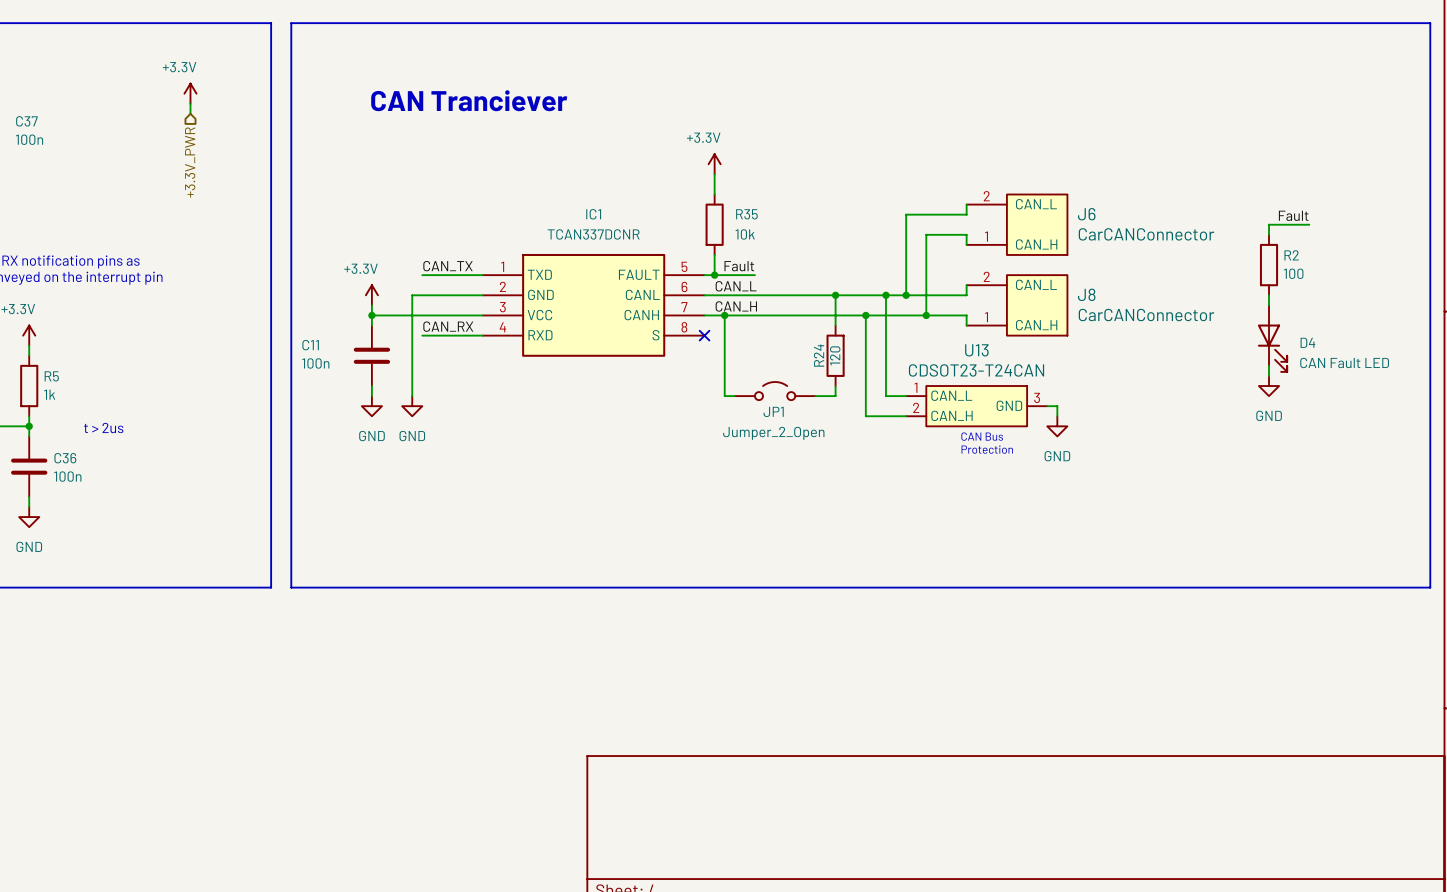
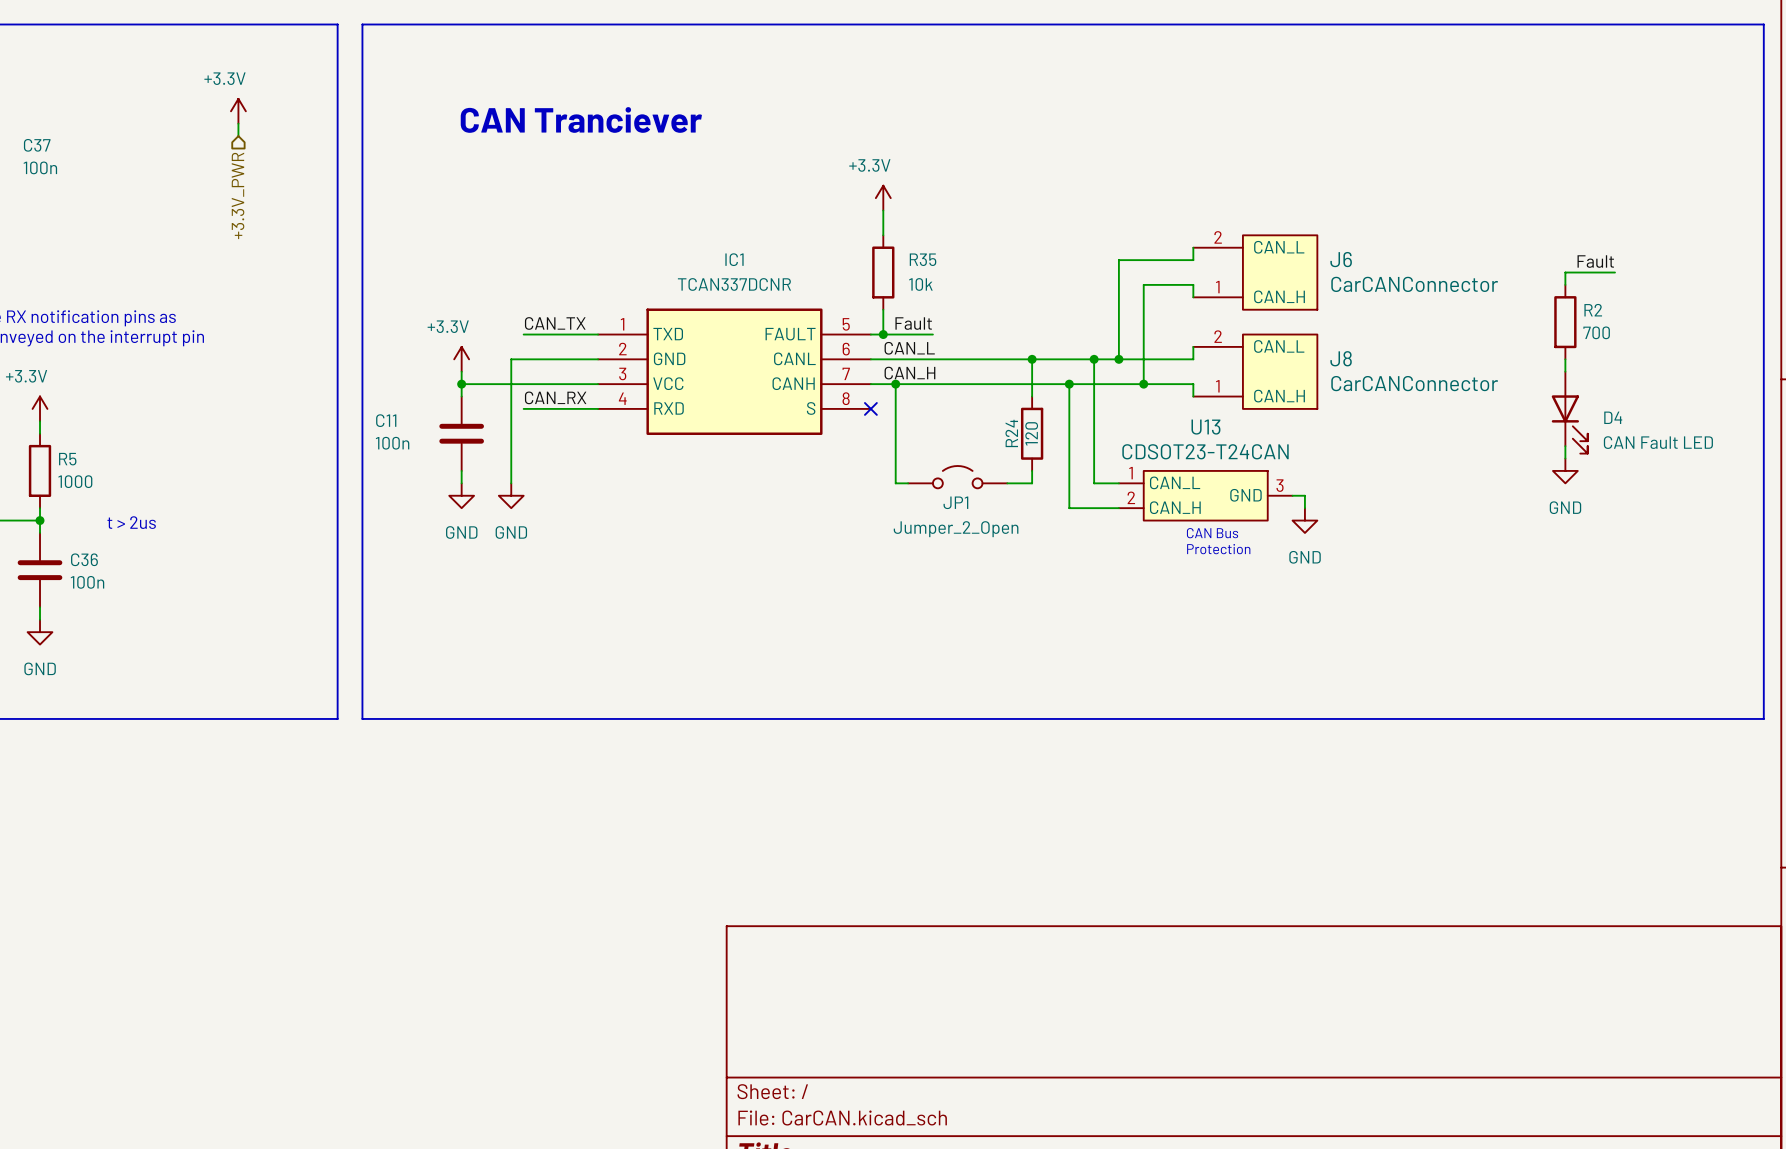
R2 value: 100 (1293, 273) -> 700 (1596, 332)
R5 value: 1k (49, 394) -> 1000 (75, 481)

